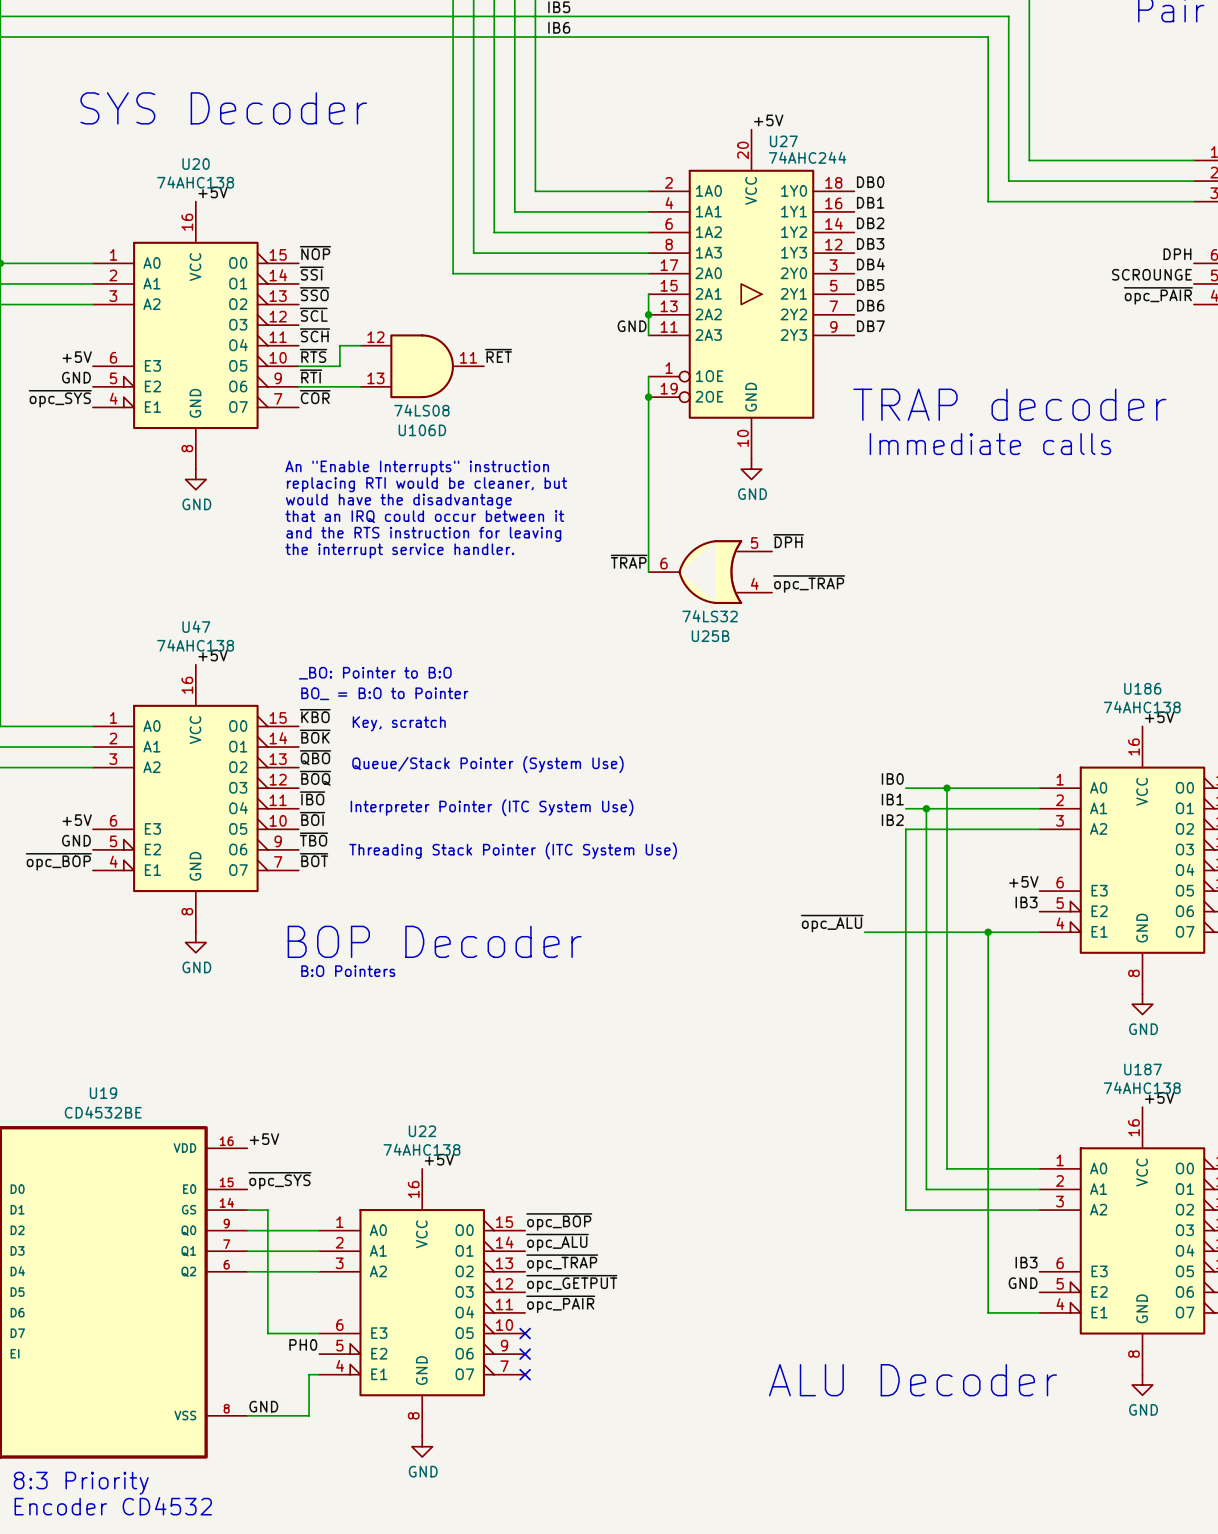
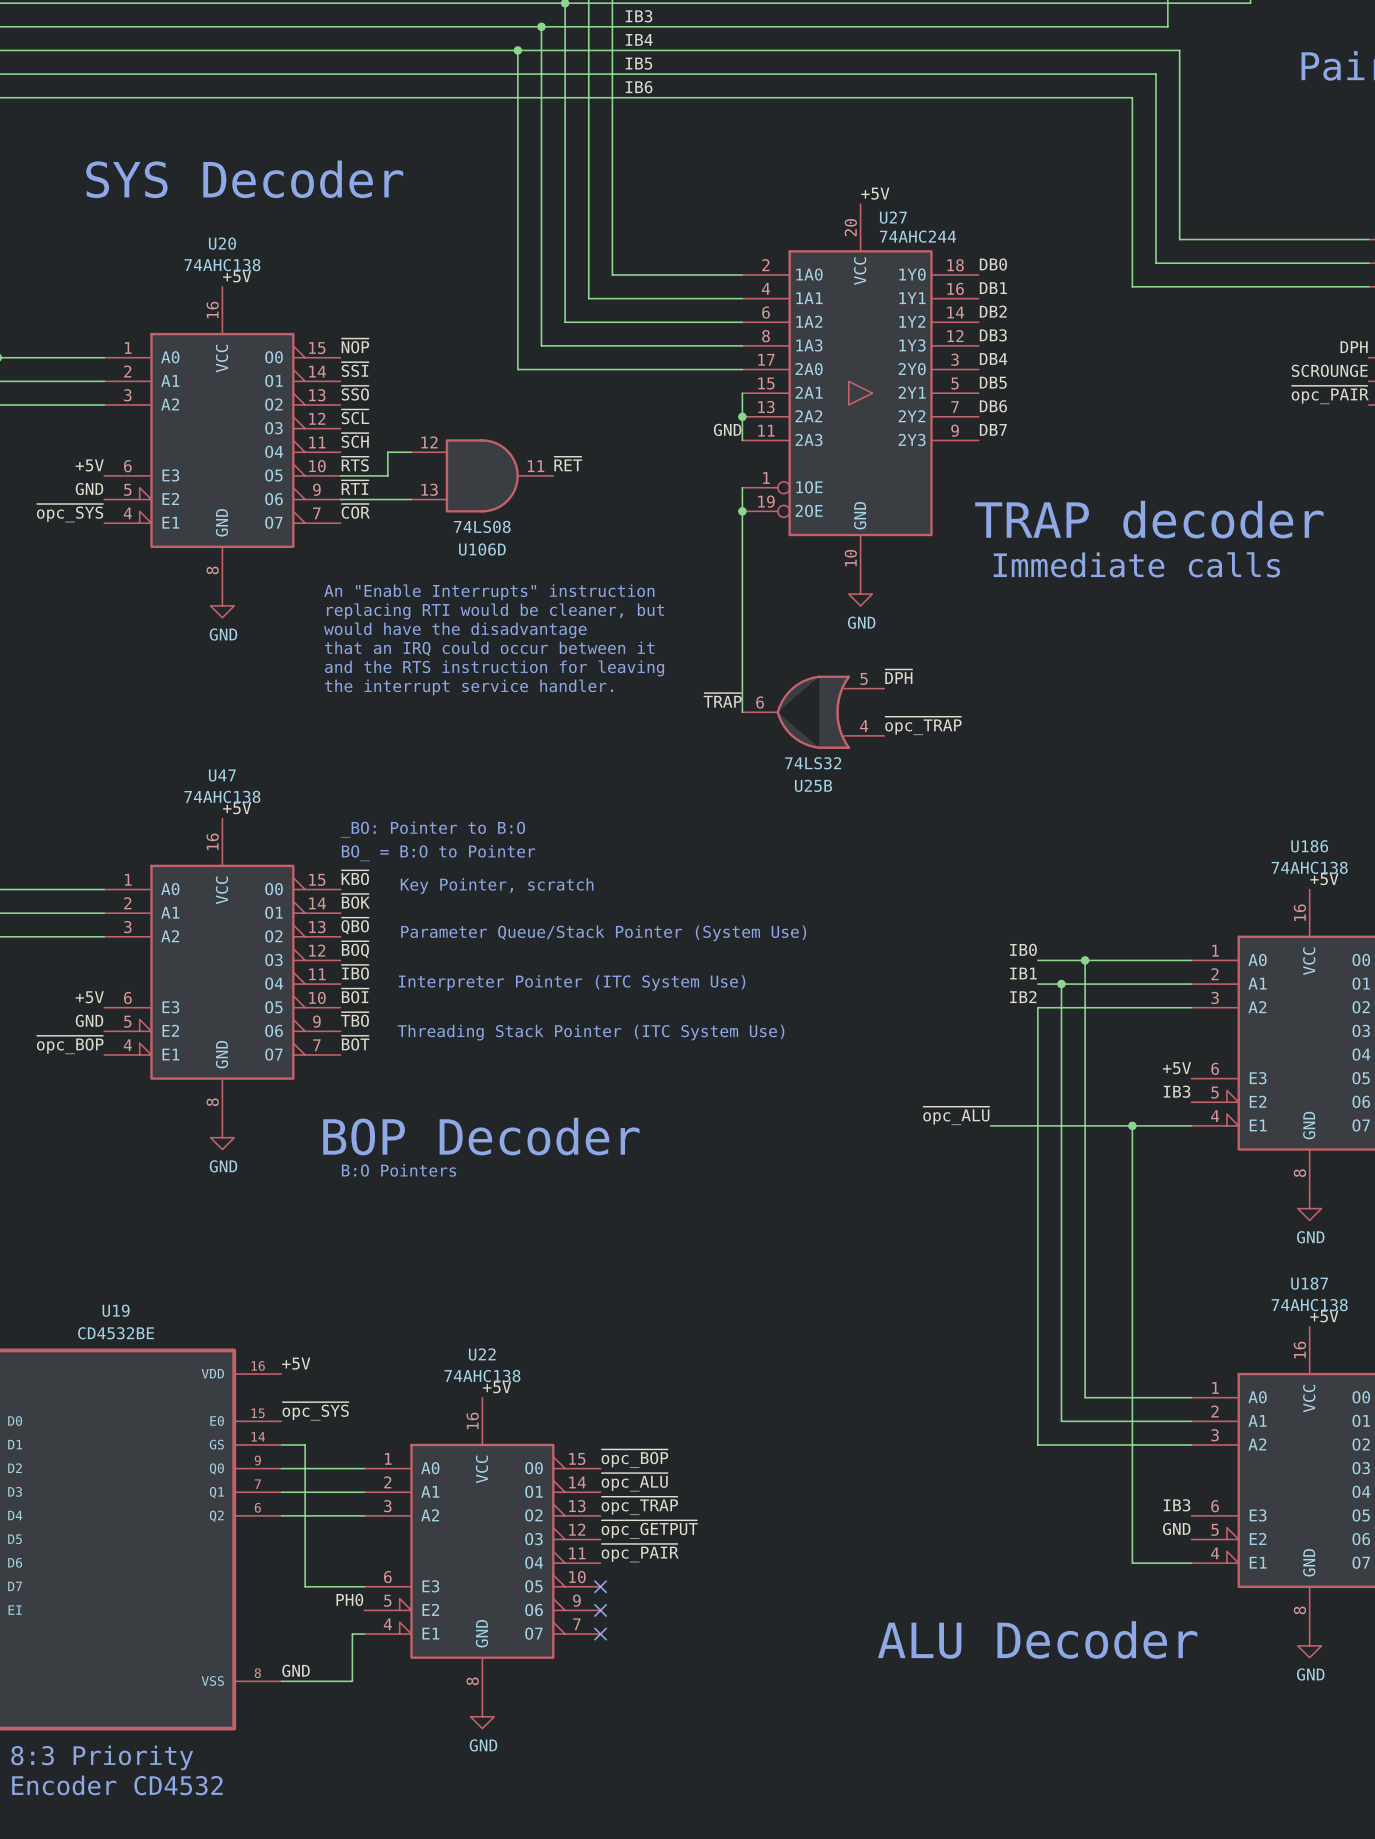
text: Key, scratch (399, 723) -> Key Pointer, scratch (497, 886)
text: Queue/Stack Pointer (System Use) (487, 764) -> Parameter Queue/Stack Pointer (System Use) (603, 933)

